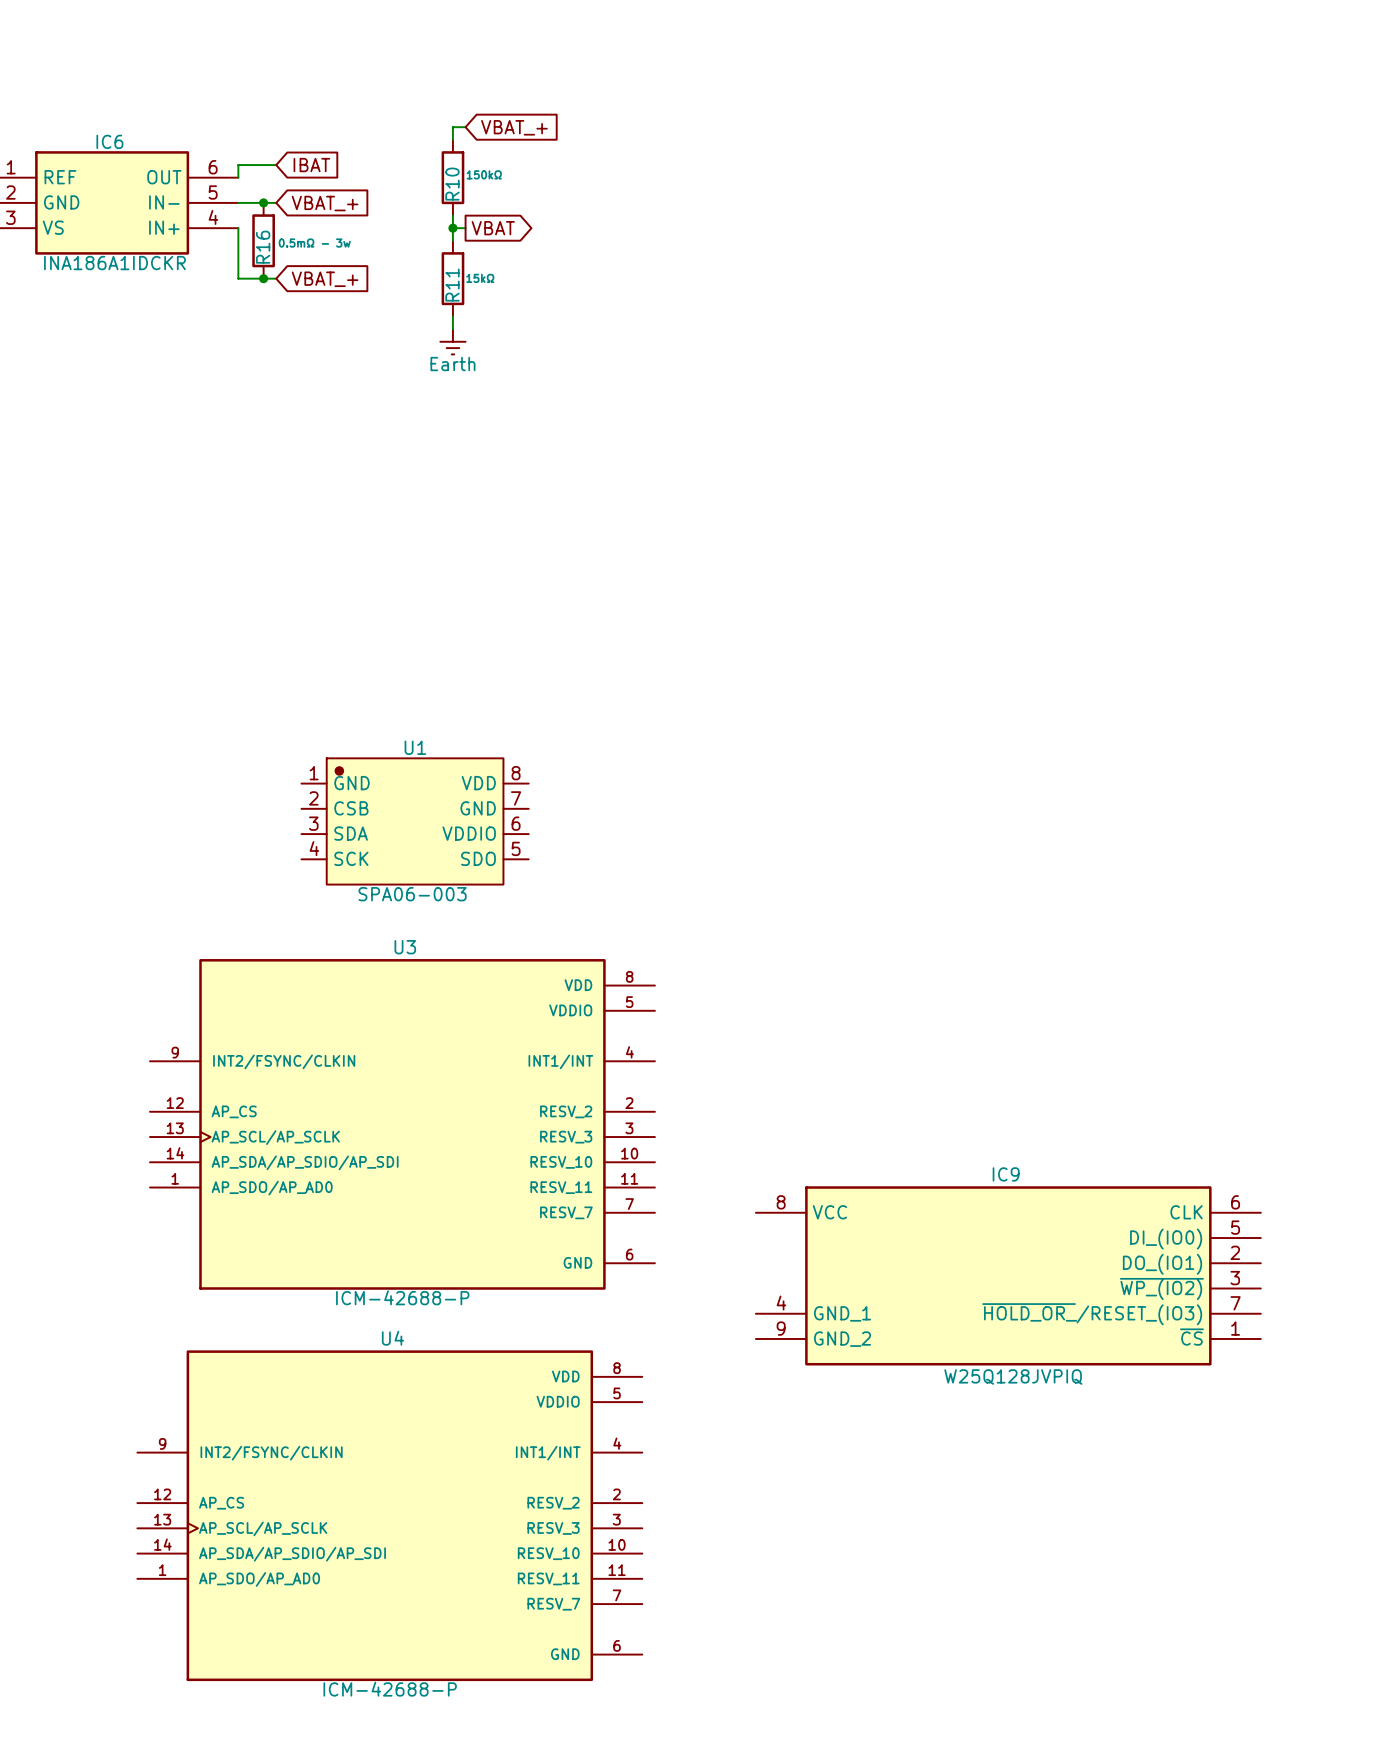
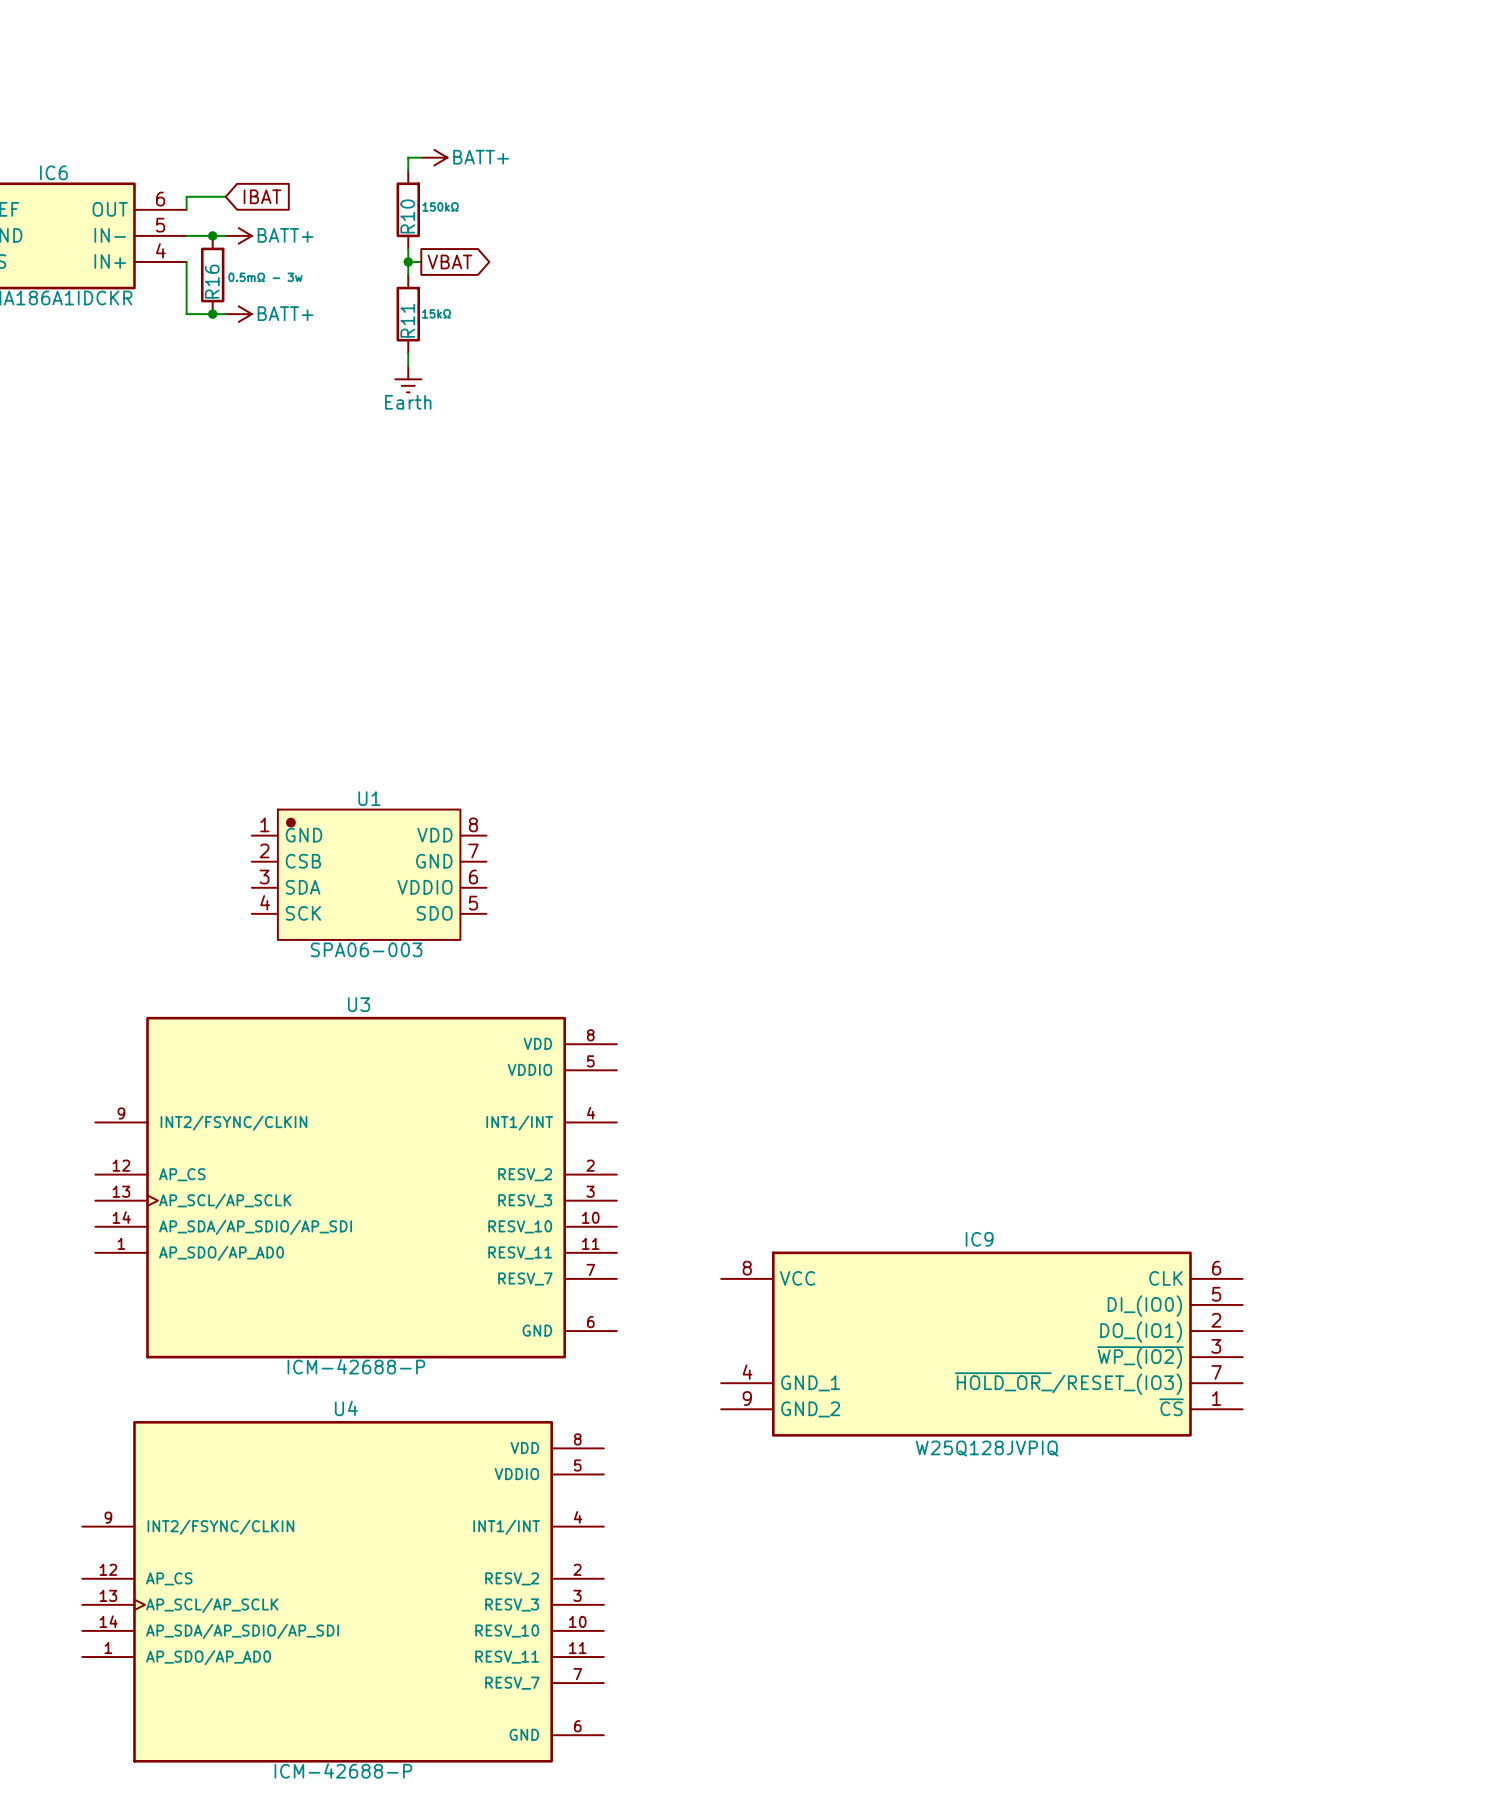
power symbol: none -> BATT+ (434, 157)
global label: VBAT_+ (514, 127) -> none
power symbol: none -> BATT+ (238, 235)
global label: VBAT_+ (325, 203) -> none
power symbol: none -> BATT+ (238, 314)
global label: VBAT_+ (325, 279) -> none

